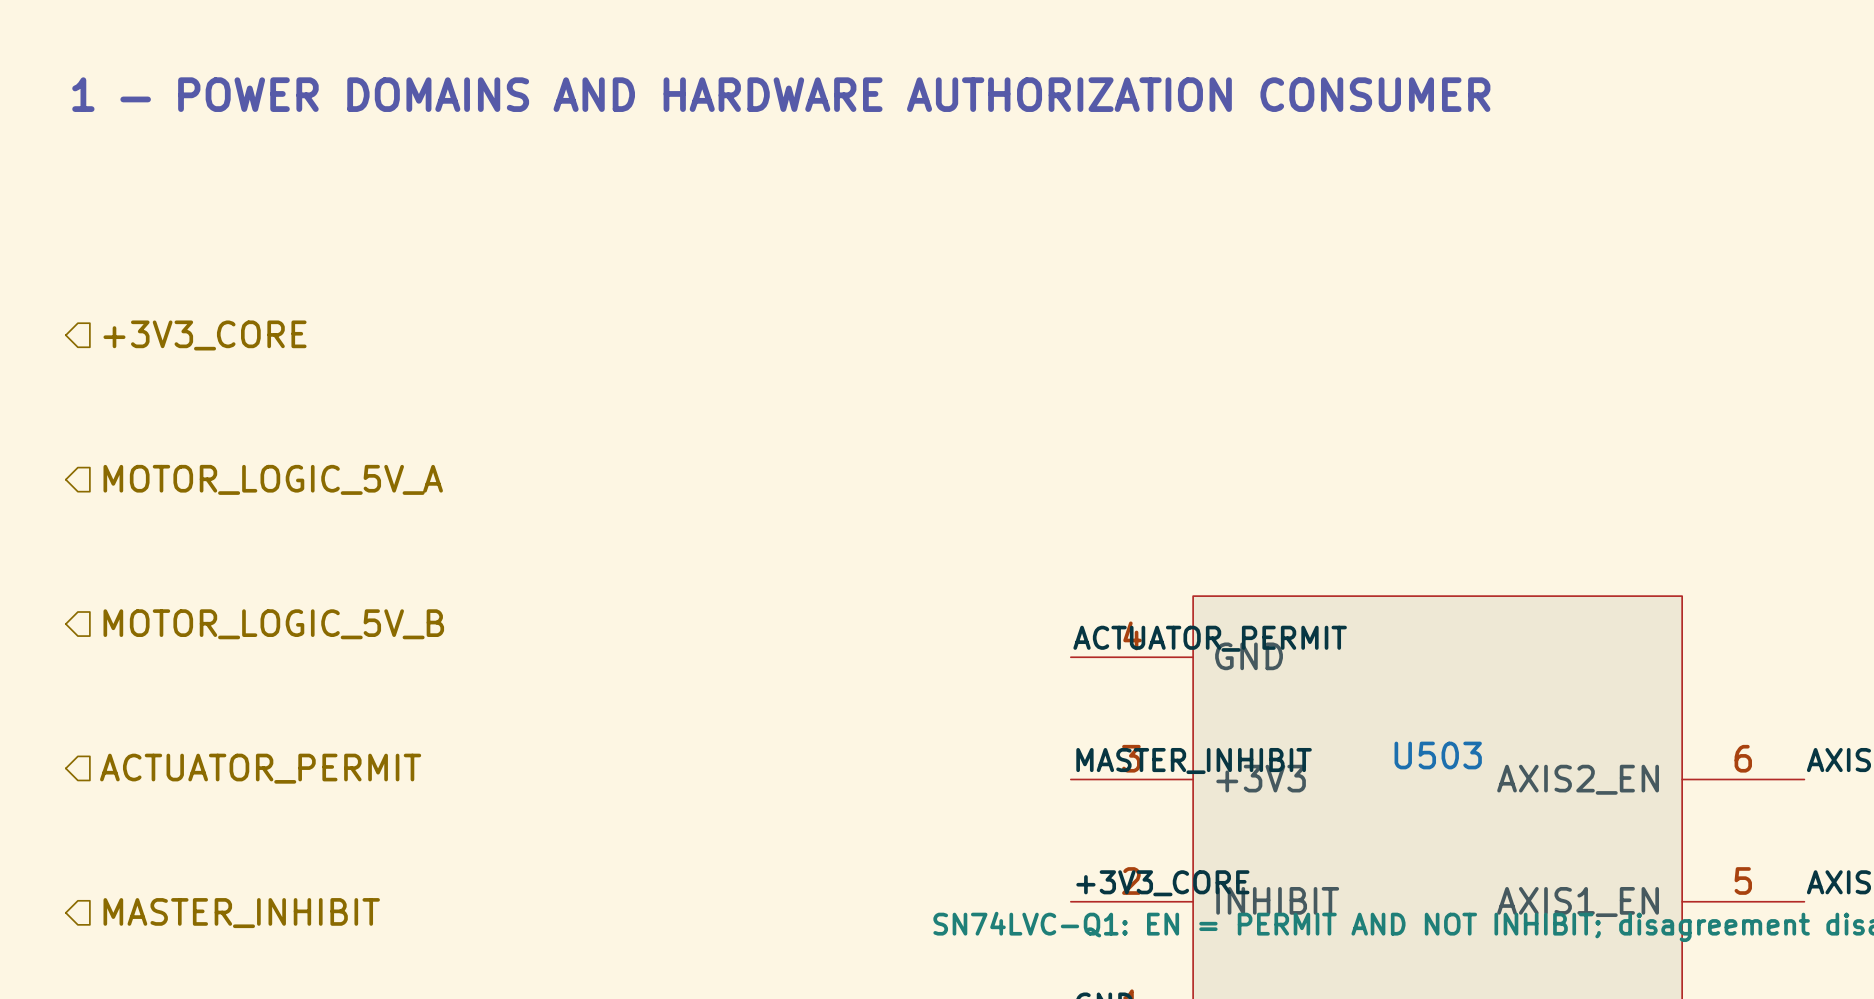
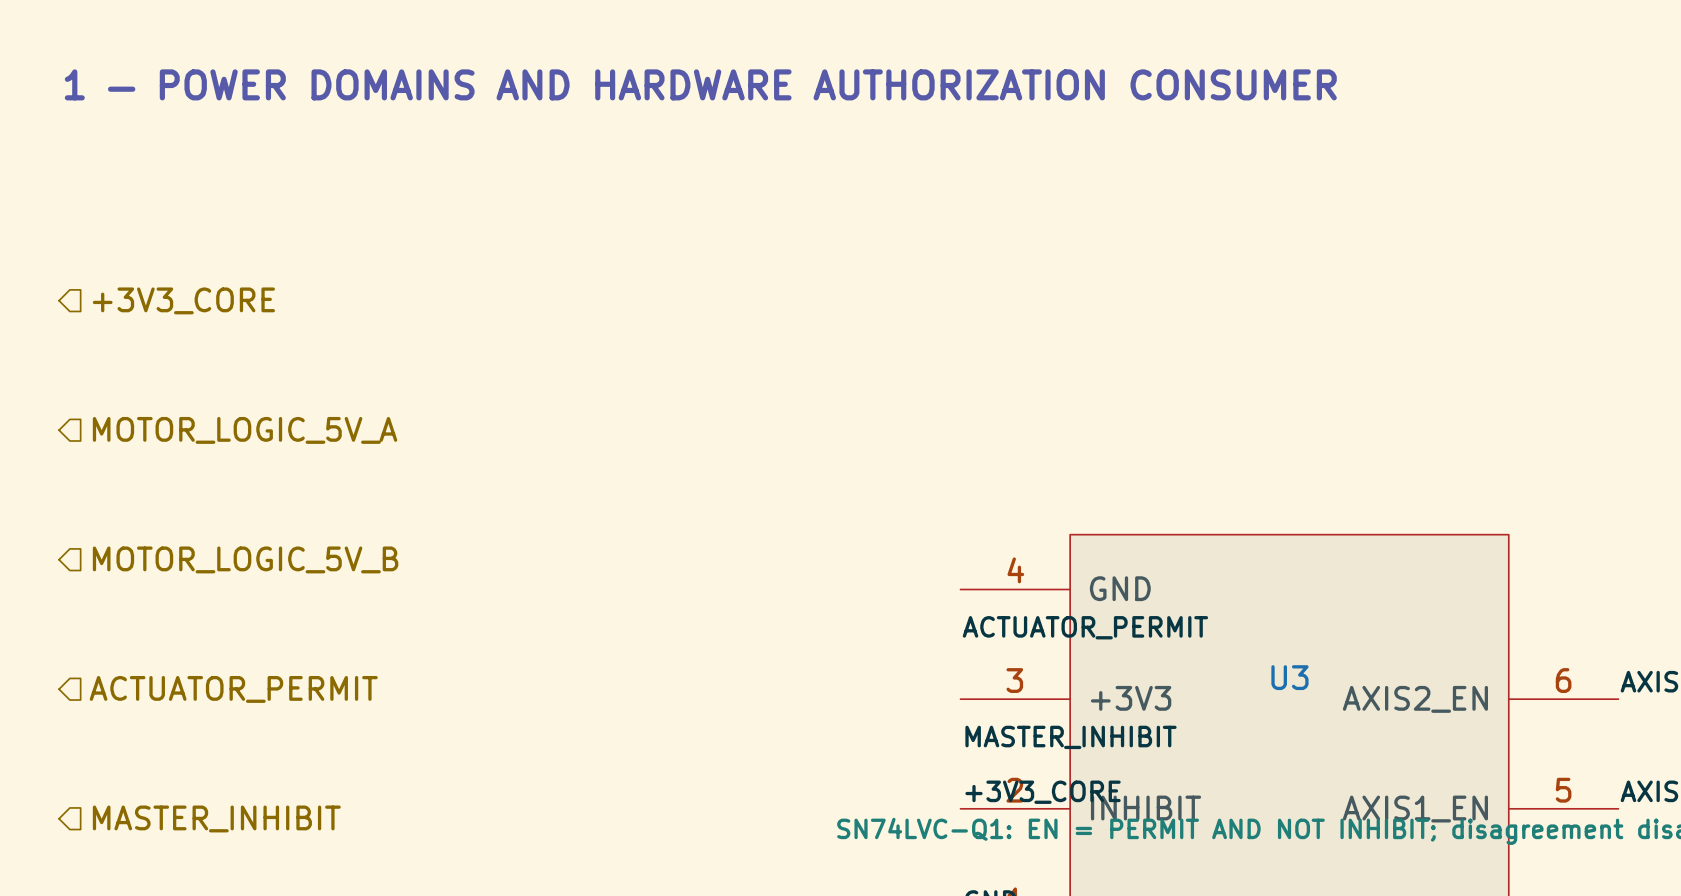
label position: ACTUATOR_PERMIT (1210, 638) -> ACTUATOR_PERMIT (1085, 627)
U503 name: U503 (1438, 755) -> U3 (1289, 677)
label position: MASTER_INHIBIT (1194, 761) -> MASTER_INHIBIT (1070, 737)

